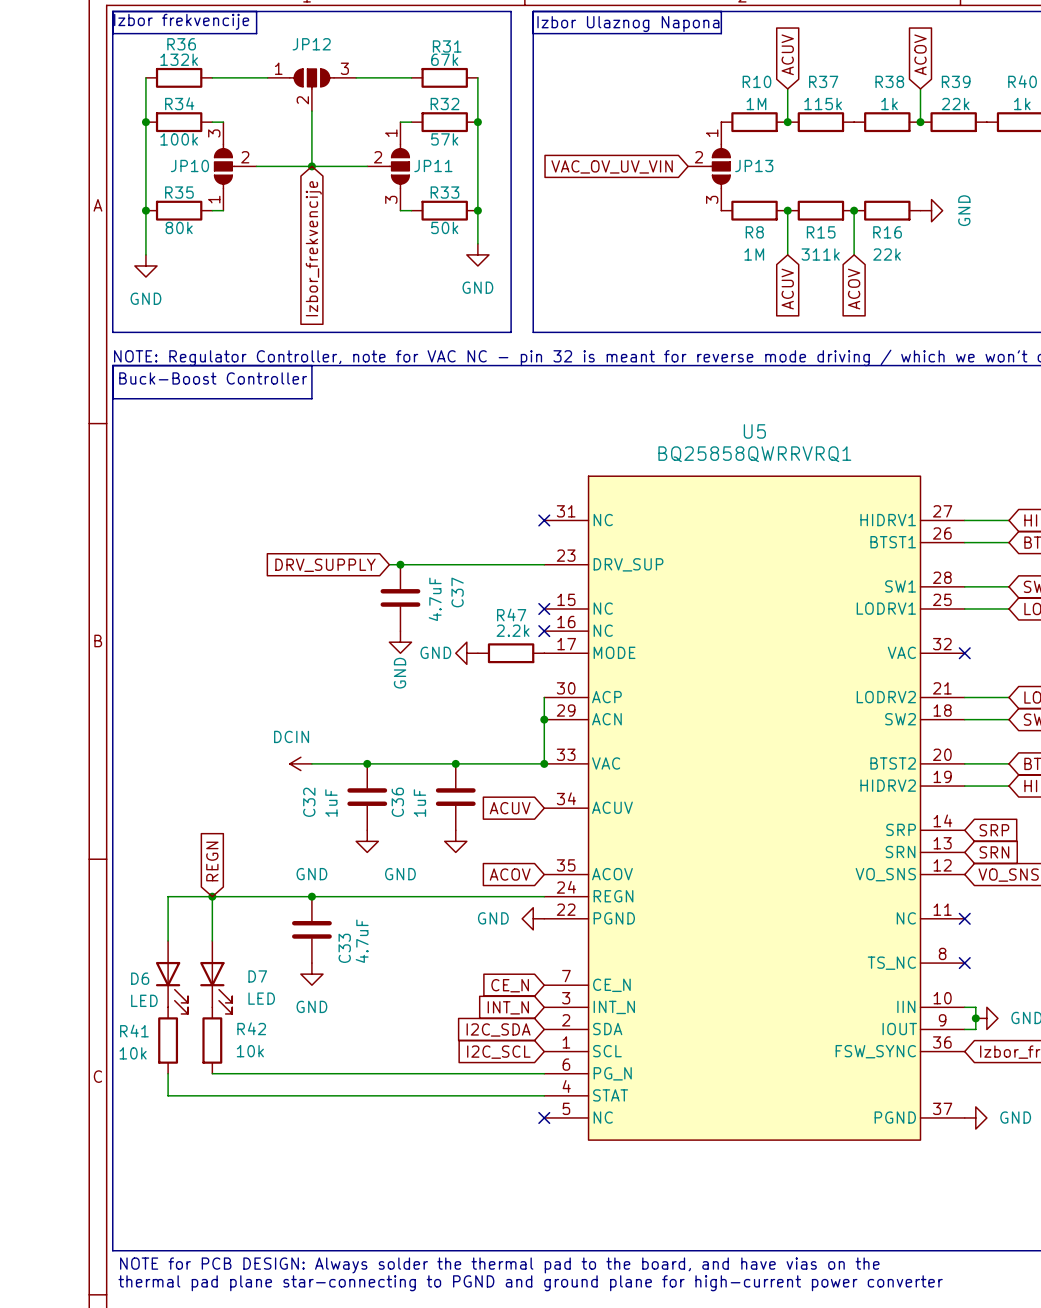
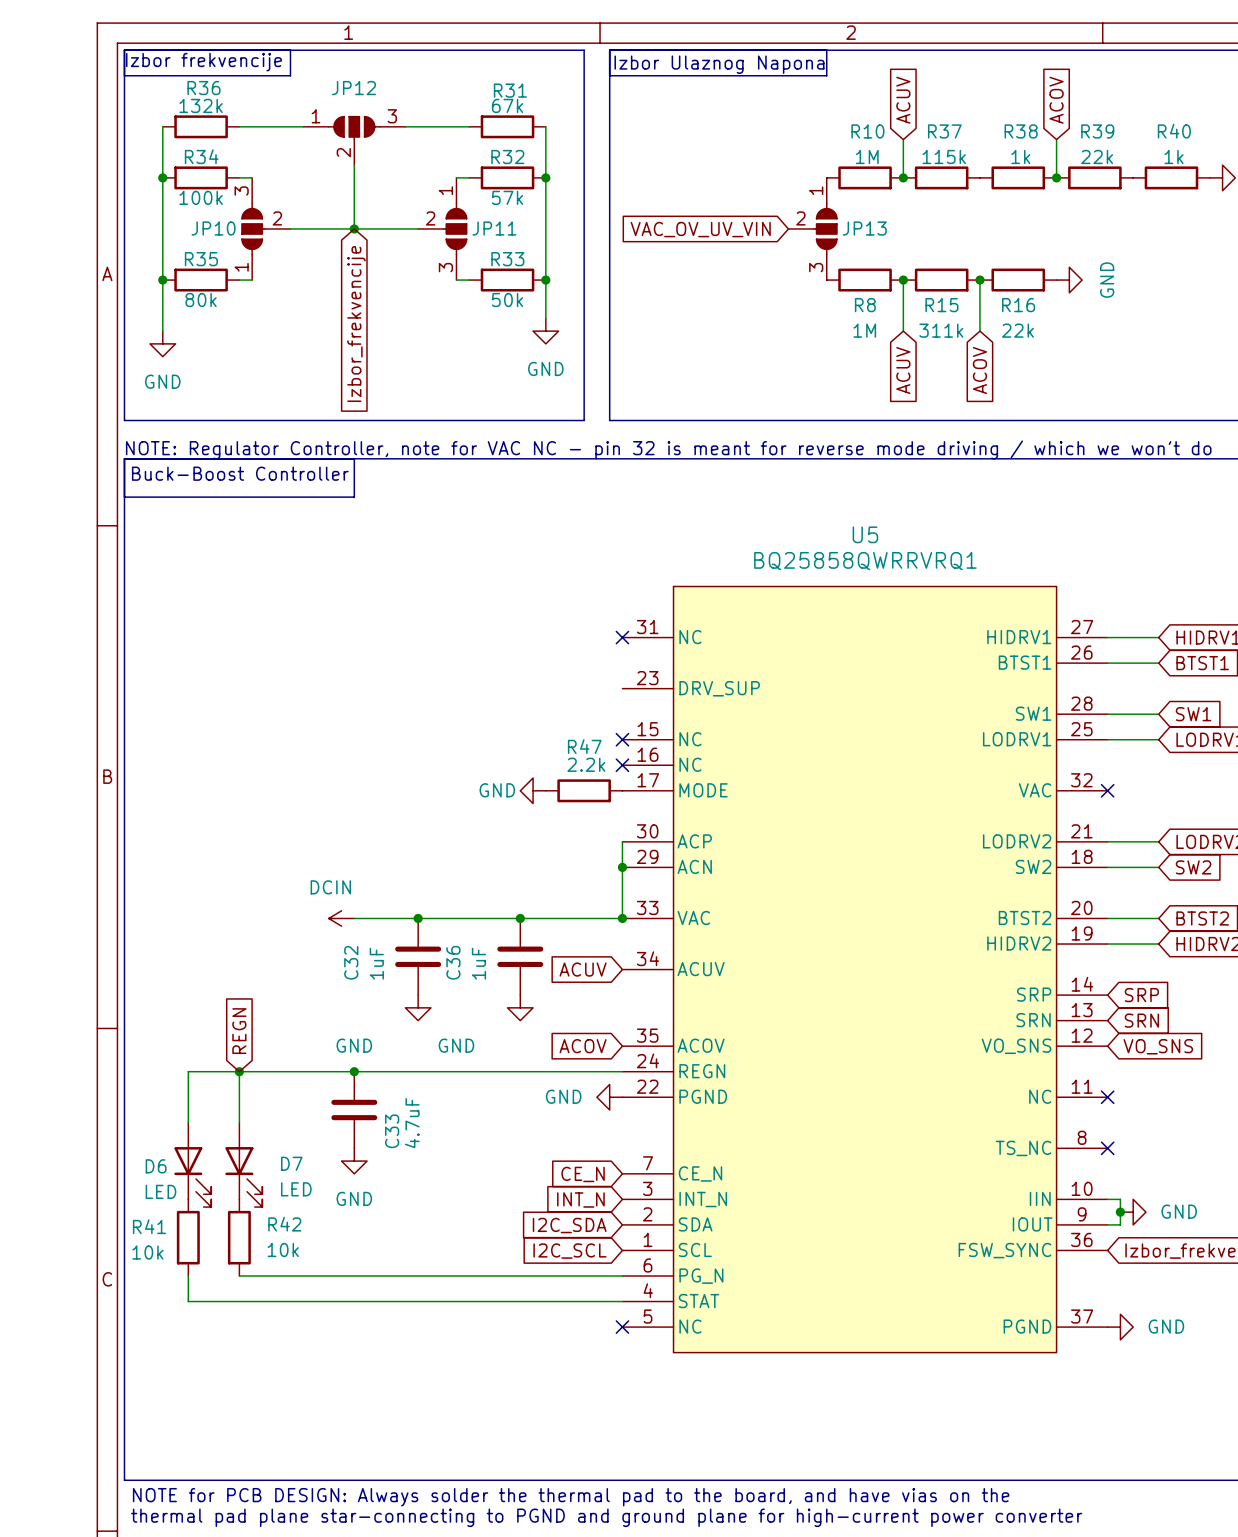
wire: (389, 564) (544, 564) -> none
junction: (400, 564) -> none
global label: DRV_SUPPLY (325, 565) -> none
C37: 4.7uF (400, 597) -> none
power symbol: GND (400, 642) -> none

